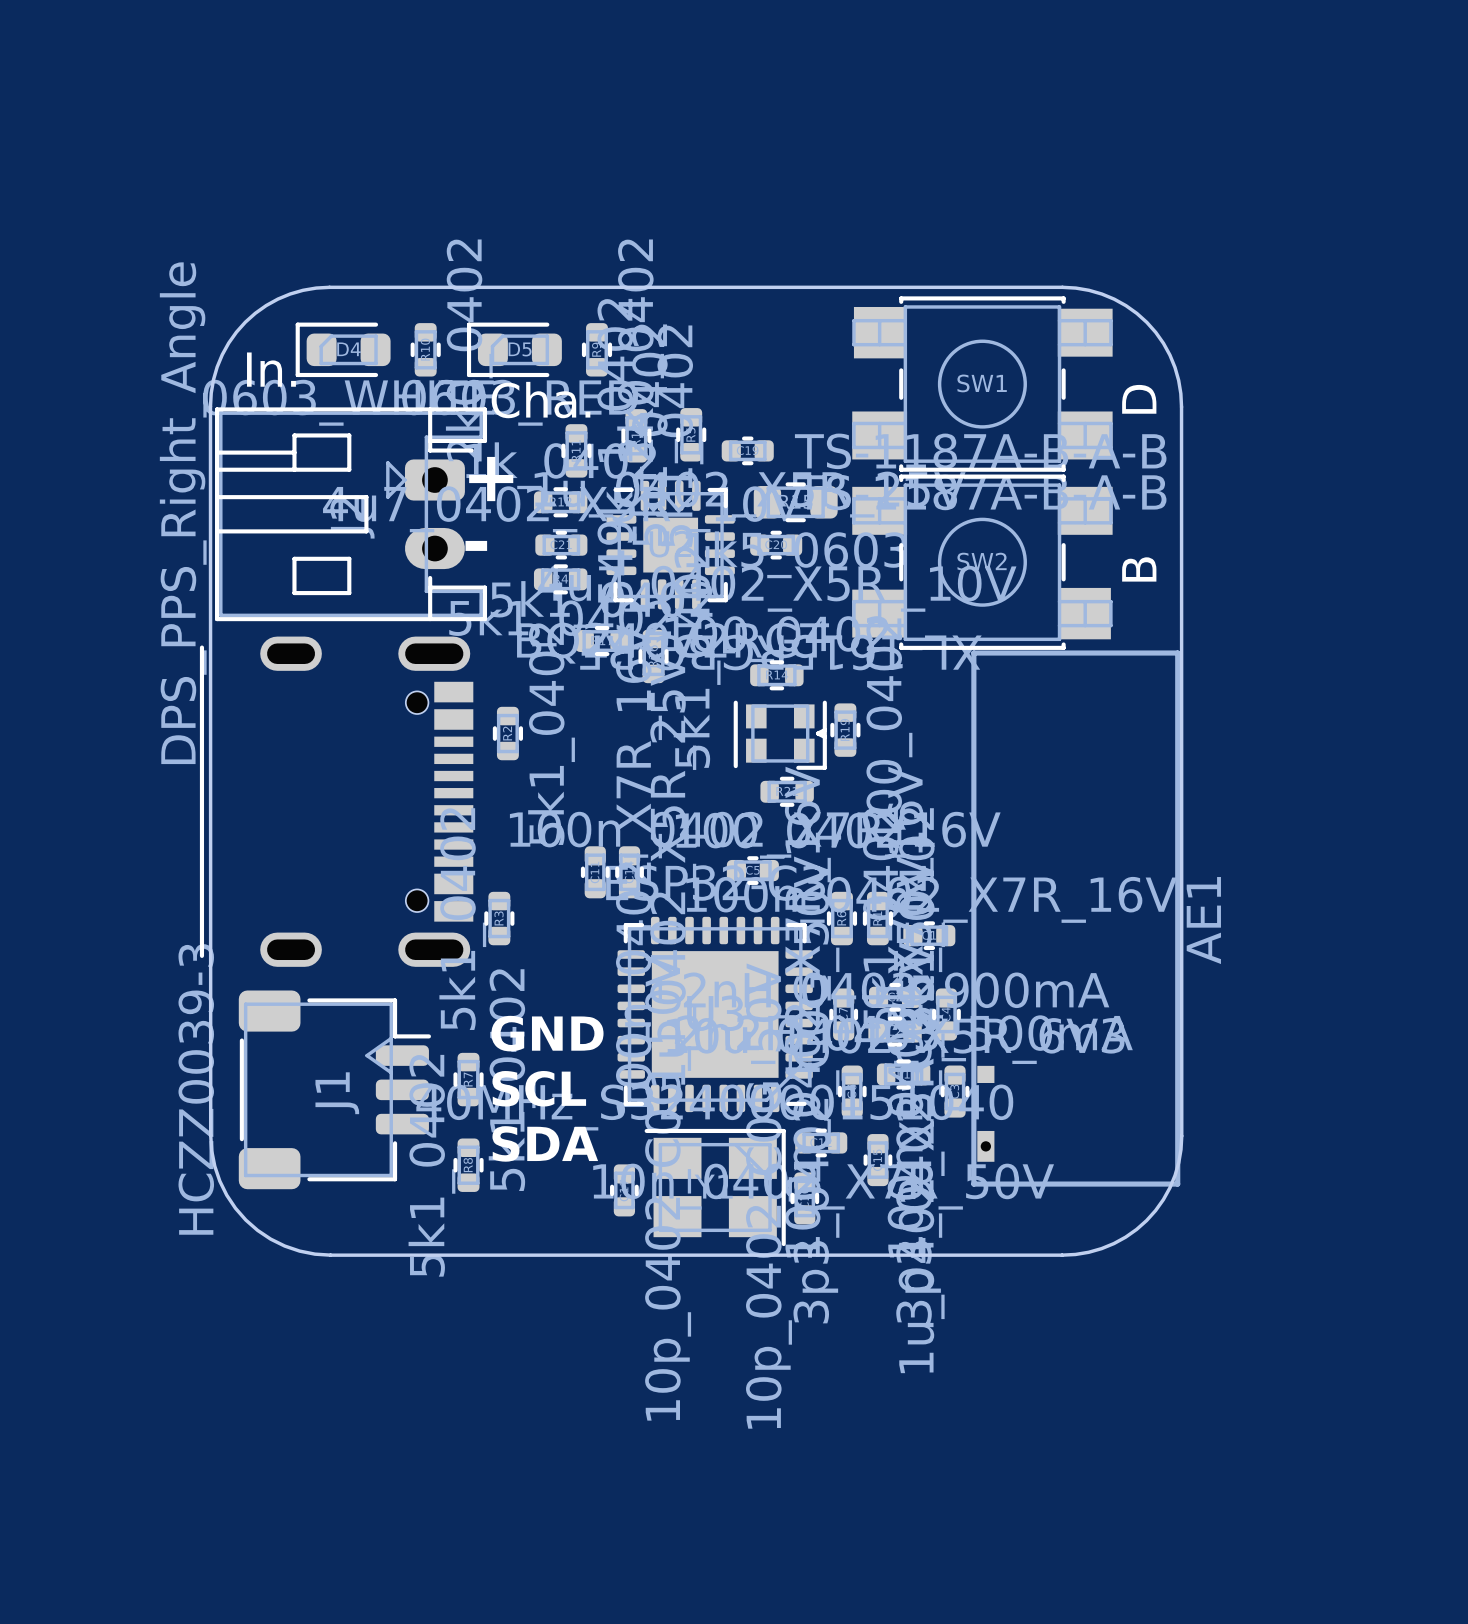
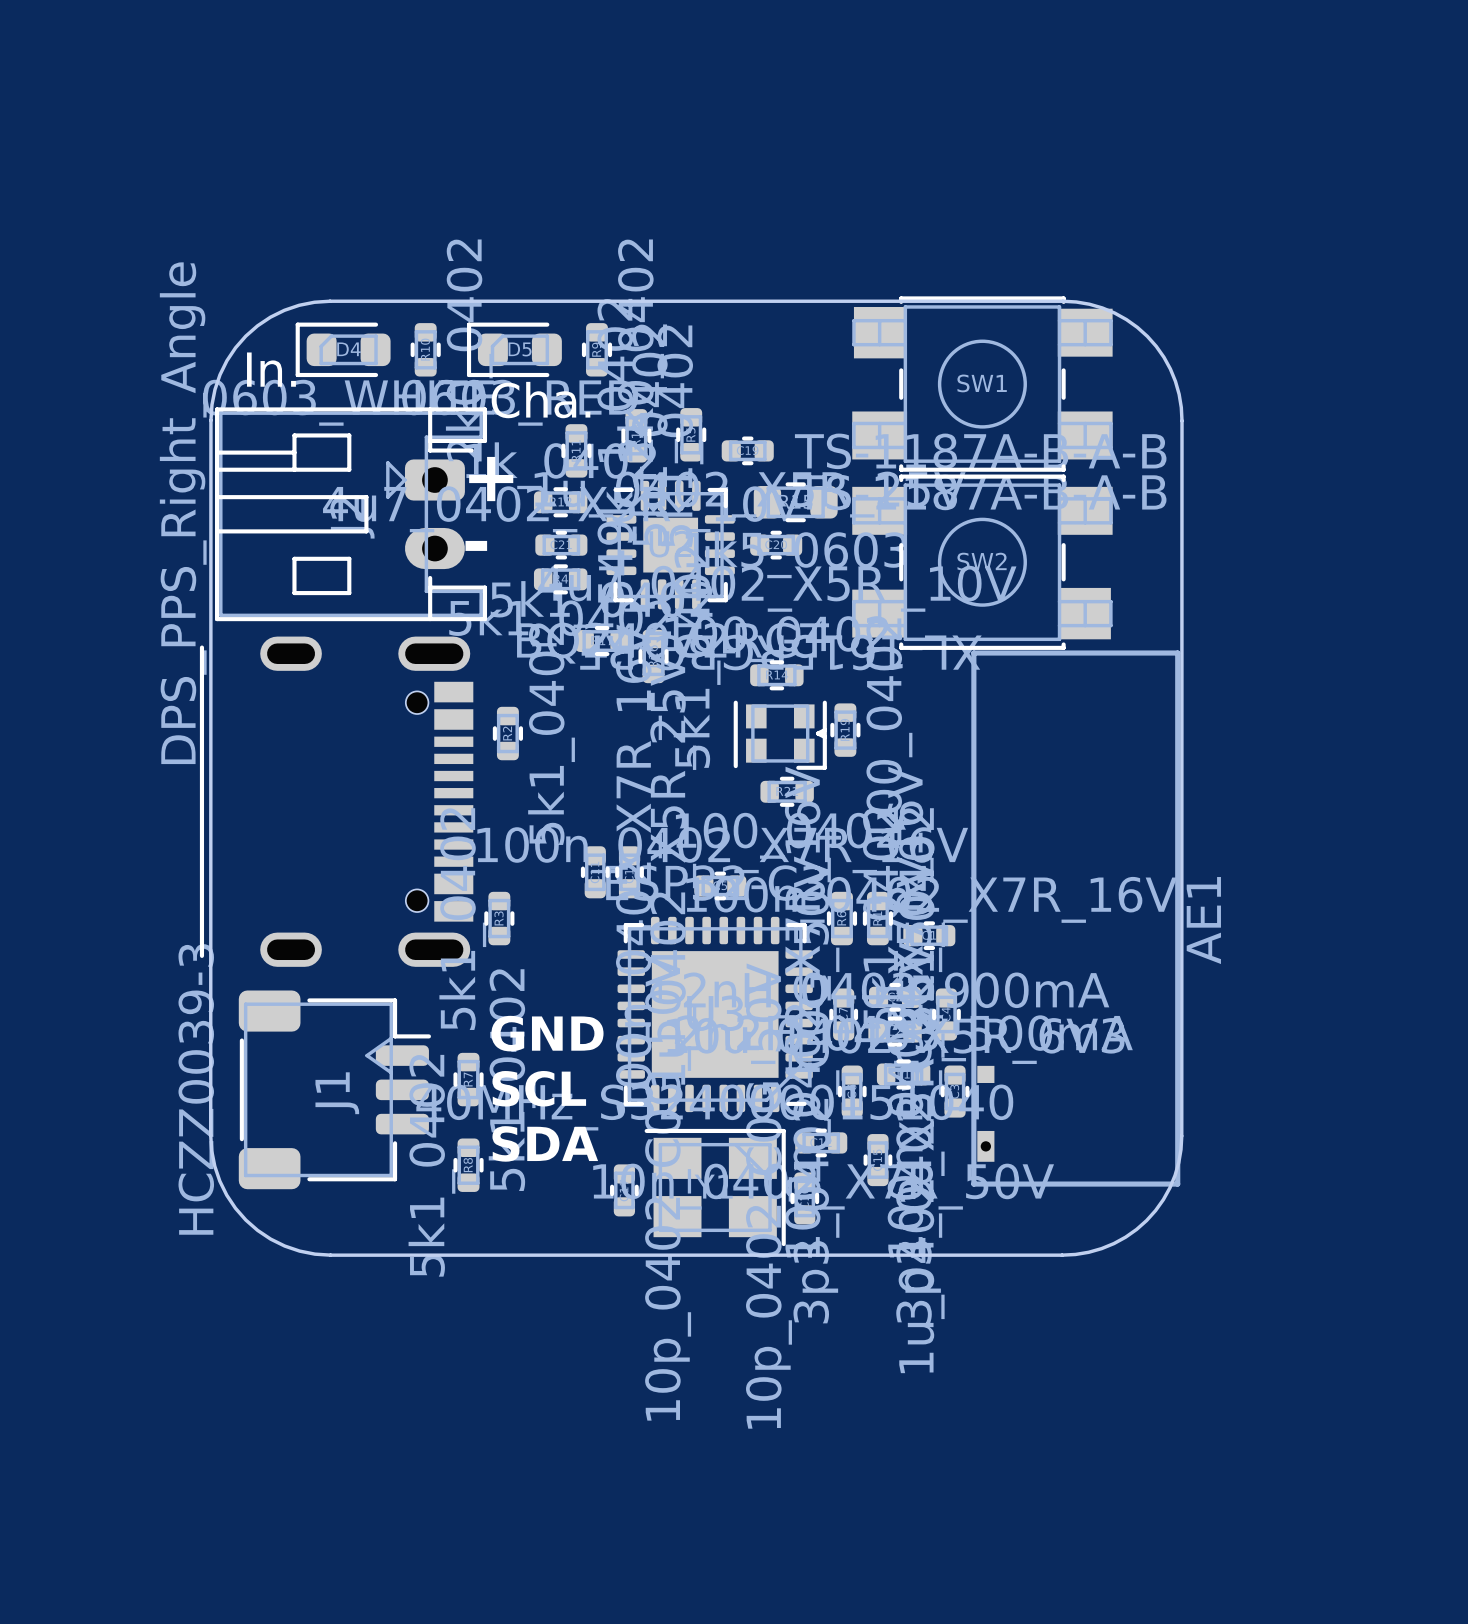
text: D (1139, 399) -> none
text: B (1139, 569) -> none
C5 position: (752, 870) -> (720, 886)
board edge: (210, 1135) (210, 406) (213, 379) (222, 354) (245, 322) (266, 305) (290, 294) (329, 287) (1062, 287) (1075, 288) (1101, 294) (1126, 305) (1136, 313) (1155, 332) (1169, 355) (1178, 380) (1180, 393) (1181, 1135) -> (210, 1135) (210, 420) (215, 389) (220, 374) (226, 360) (245, 336) (270, 317) (284, 310) (314, 302) (330, 301) (1062, 301) (1076, 302) (1102, 307) (1126, 319) (1137, 327) (1156, 346) (1163, 357) (1175, 381) (1181, 407) (1181, 1135)

